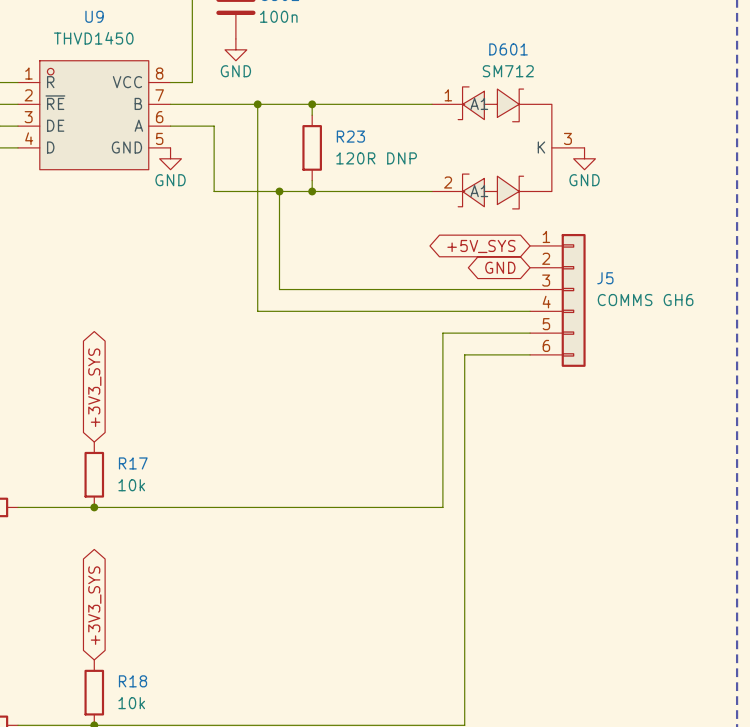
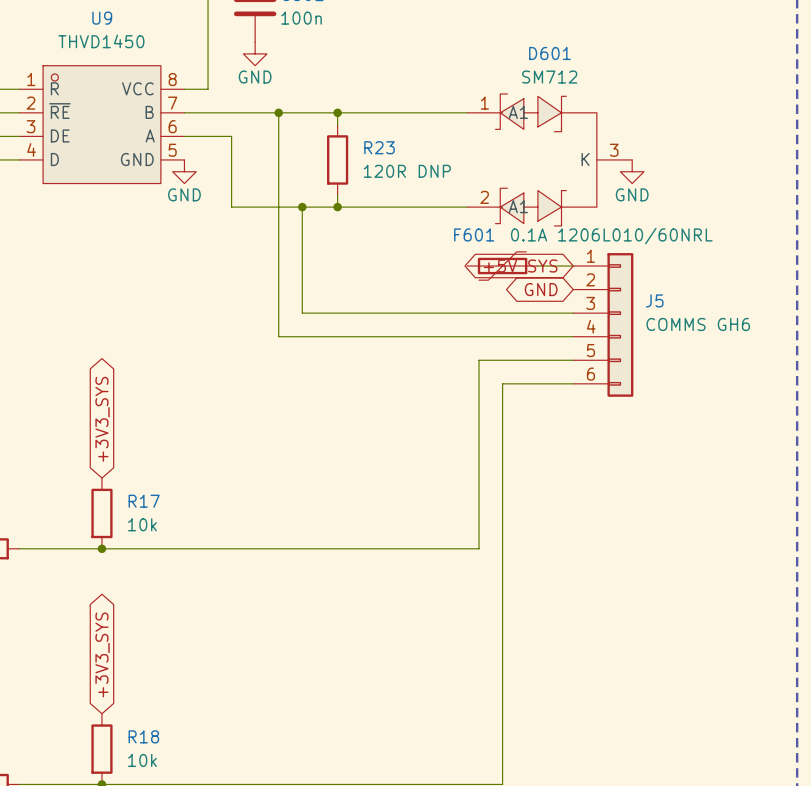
F601: none -> 0.1A 1206L010/60NRL (502, 266)
wire: none -> (537, 266) (573, 266)

